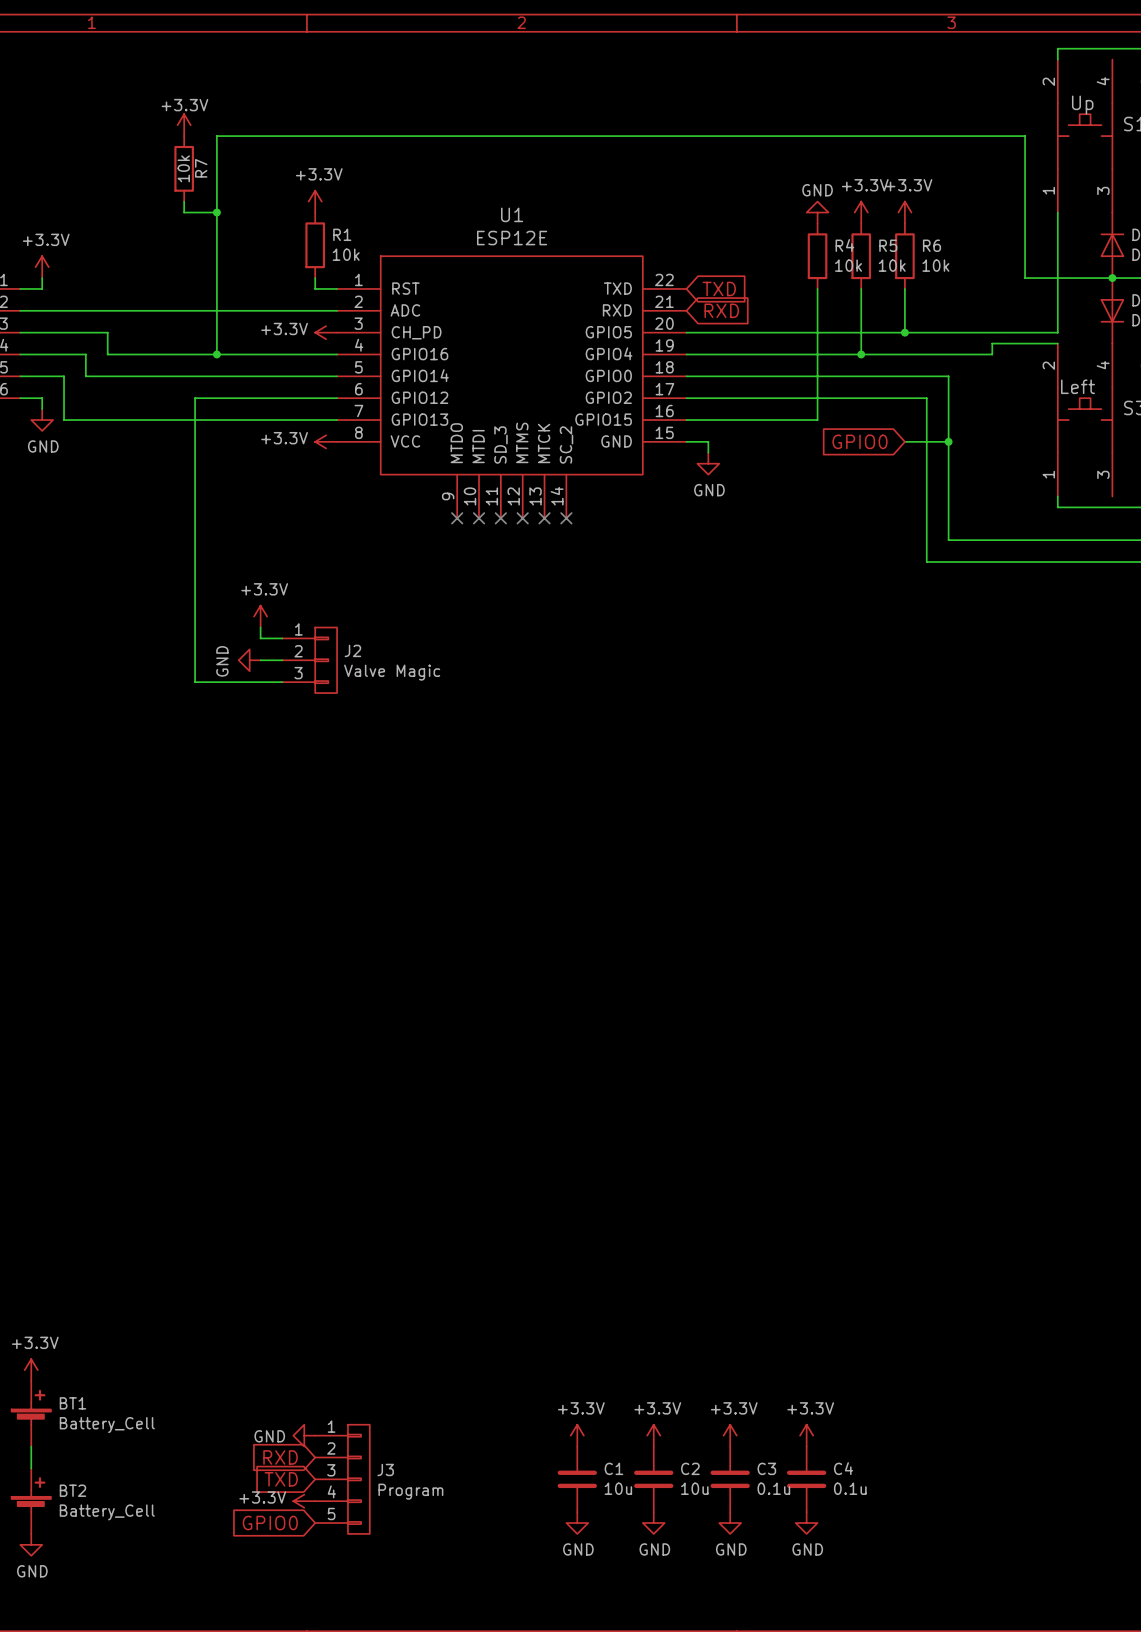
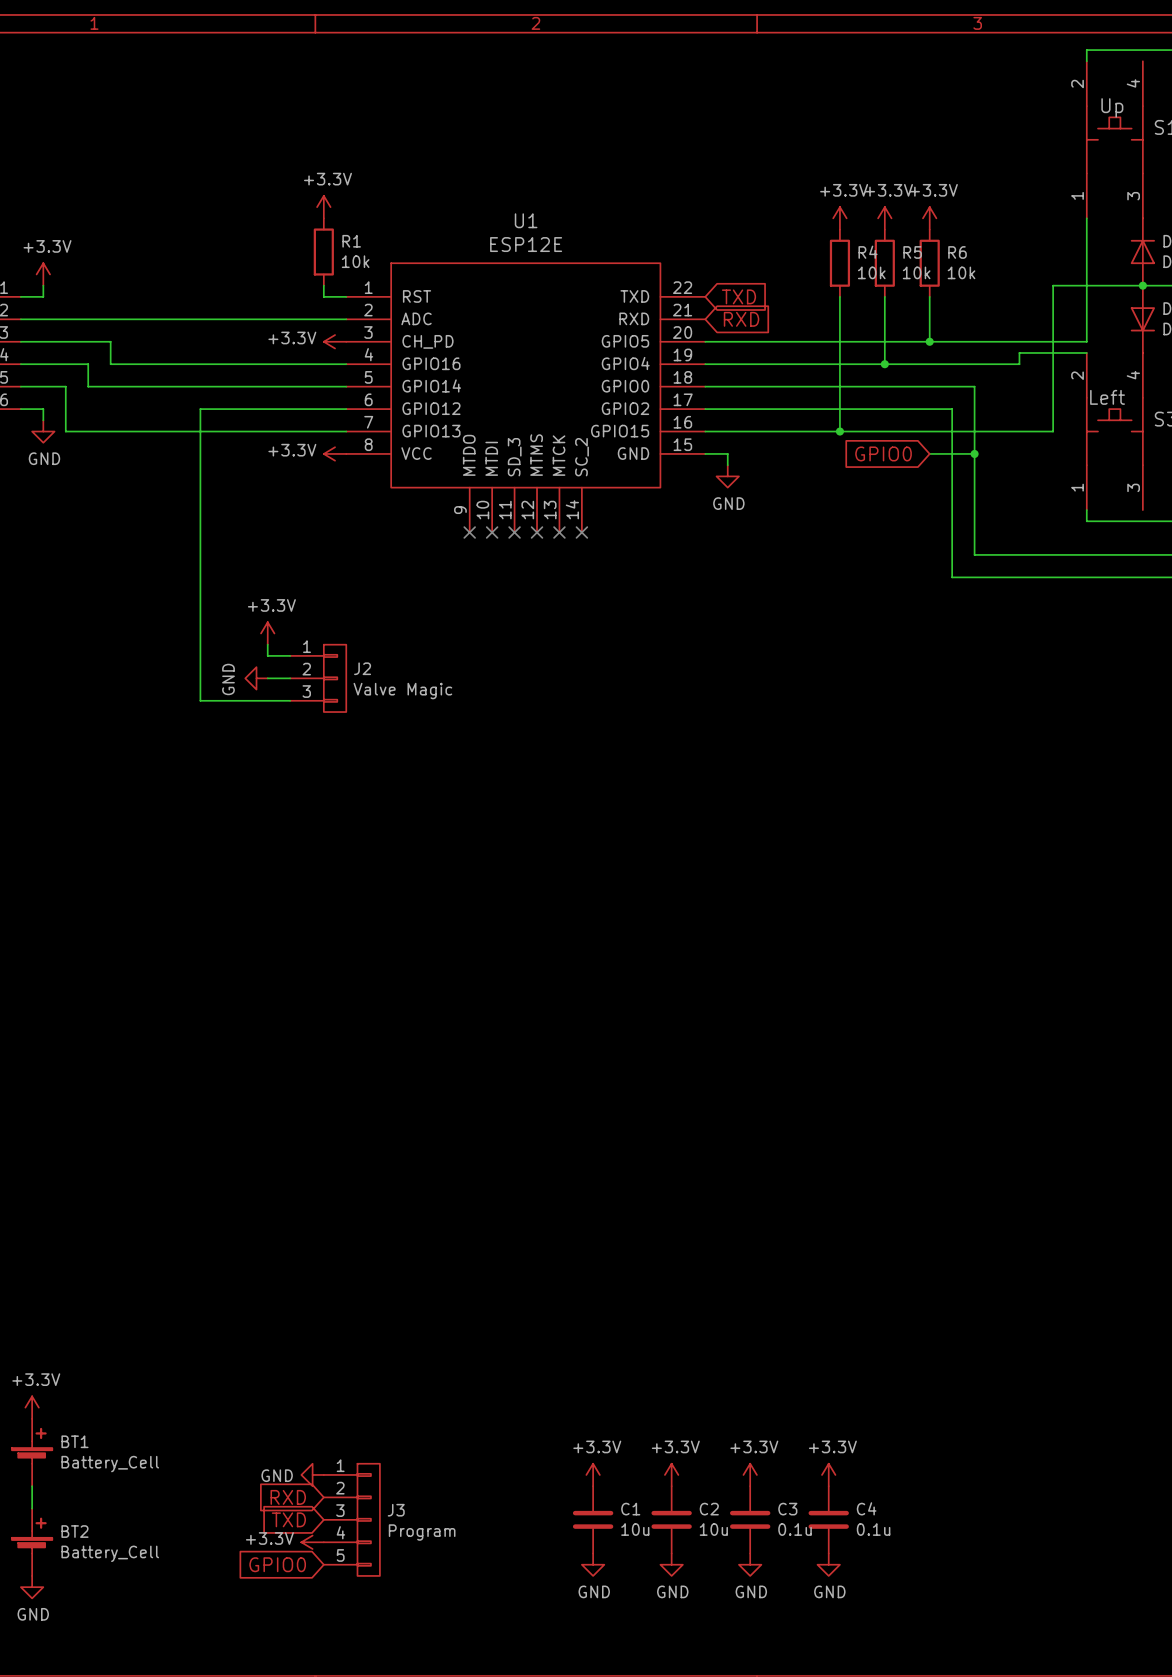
power symbol: +3.3V (184, 125) -> none
R7: 10k (184, 168) -> none
wire: (184, 201) (184, 212) (216, 212) -> none
junction: (216, 212) -> none
power symbol: GND (817, 212) -> +3.3V (839, 218)
wire: (1025, 278) (1025, 136) (216, 136) (216, 354) -> (1053, 285) (1053, 431) (839, 431)
junction: (216, 354) -> none
junction: none -> (839, 431)

